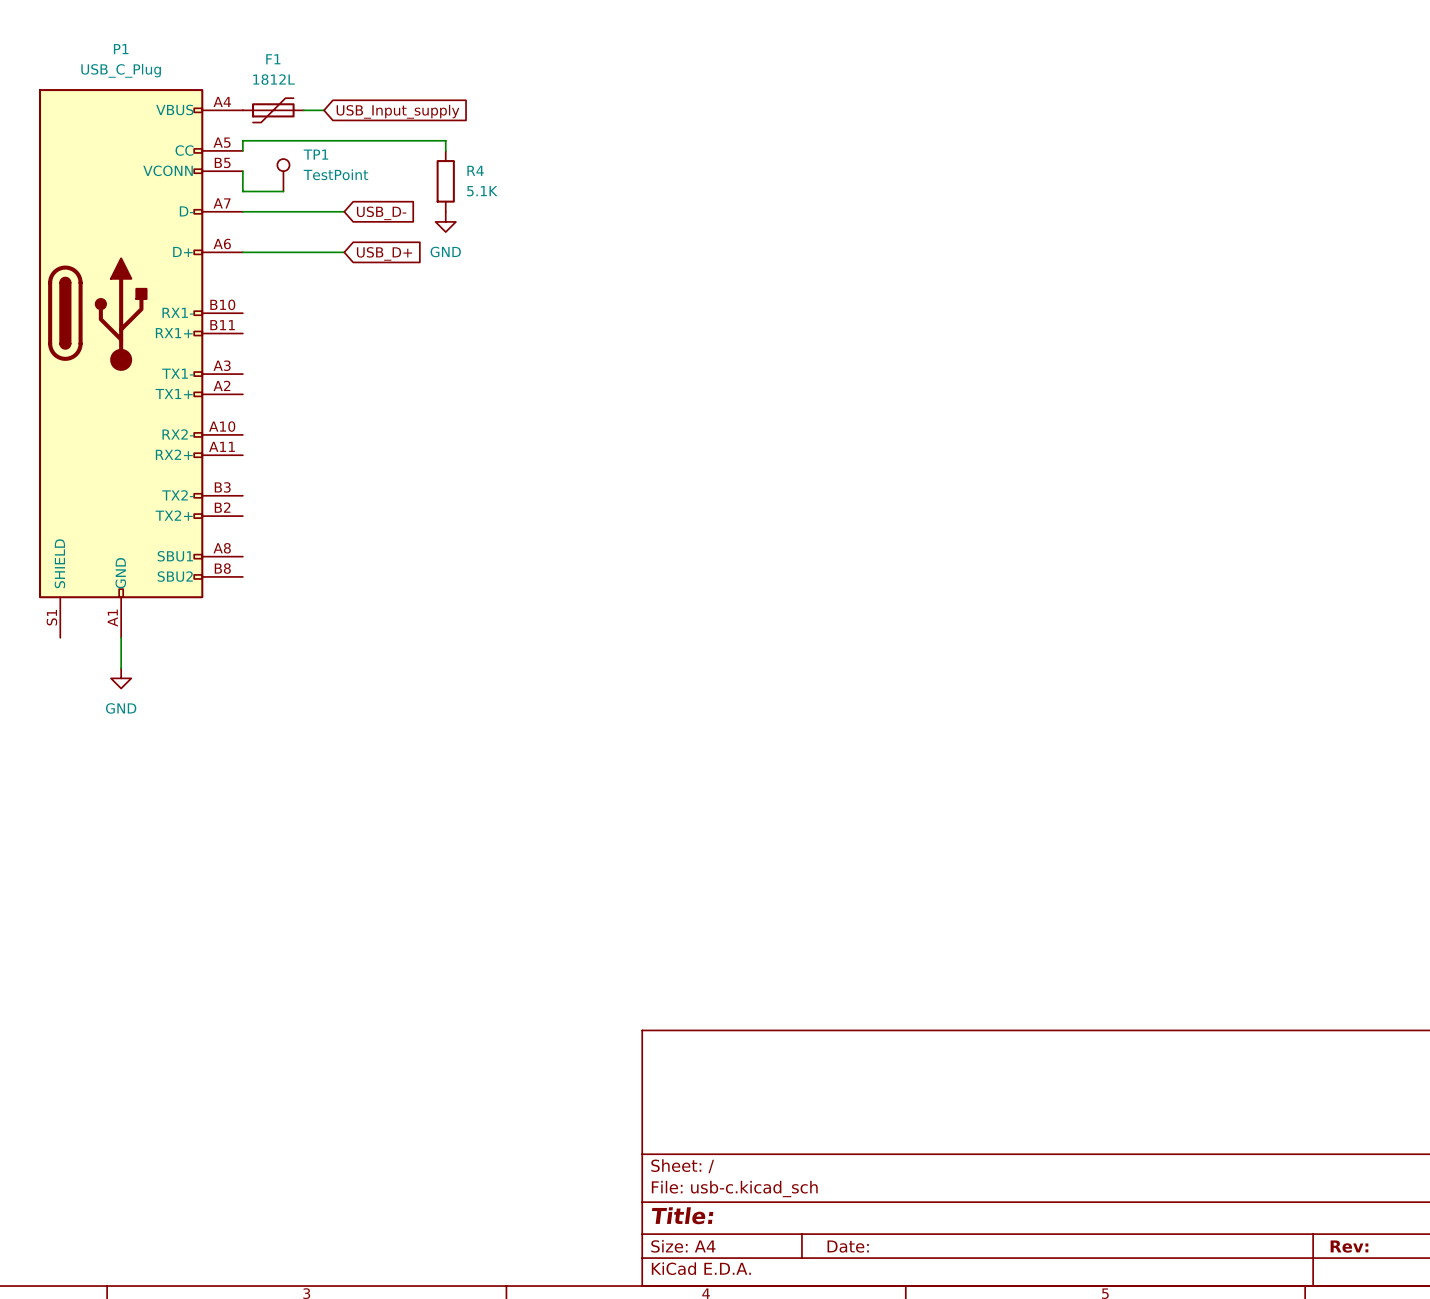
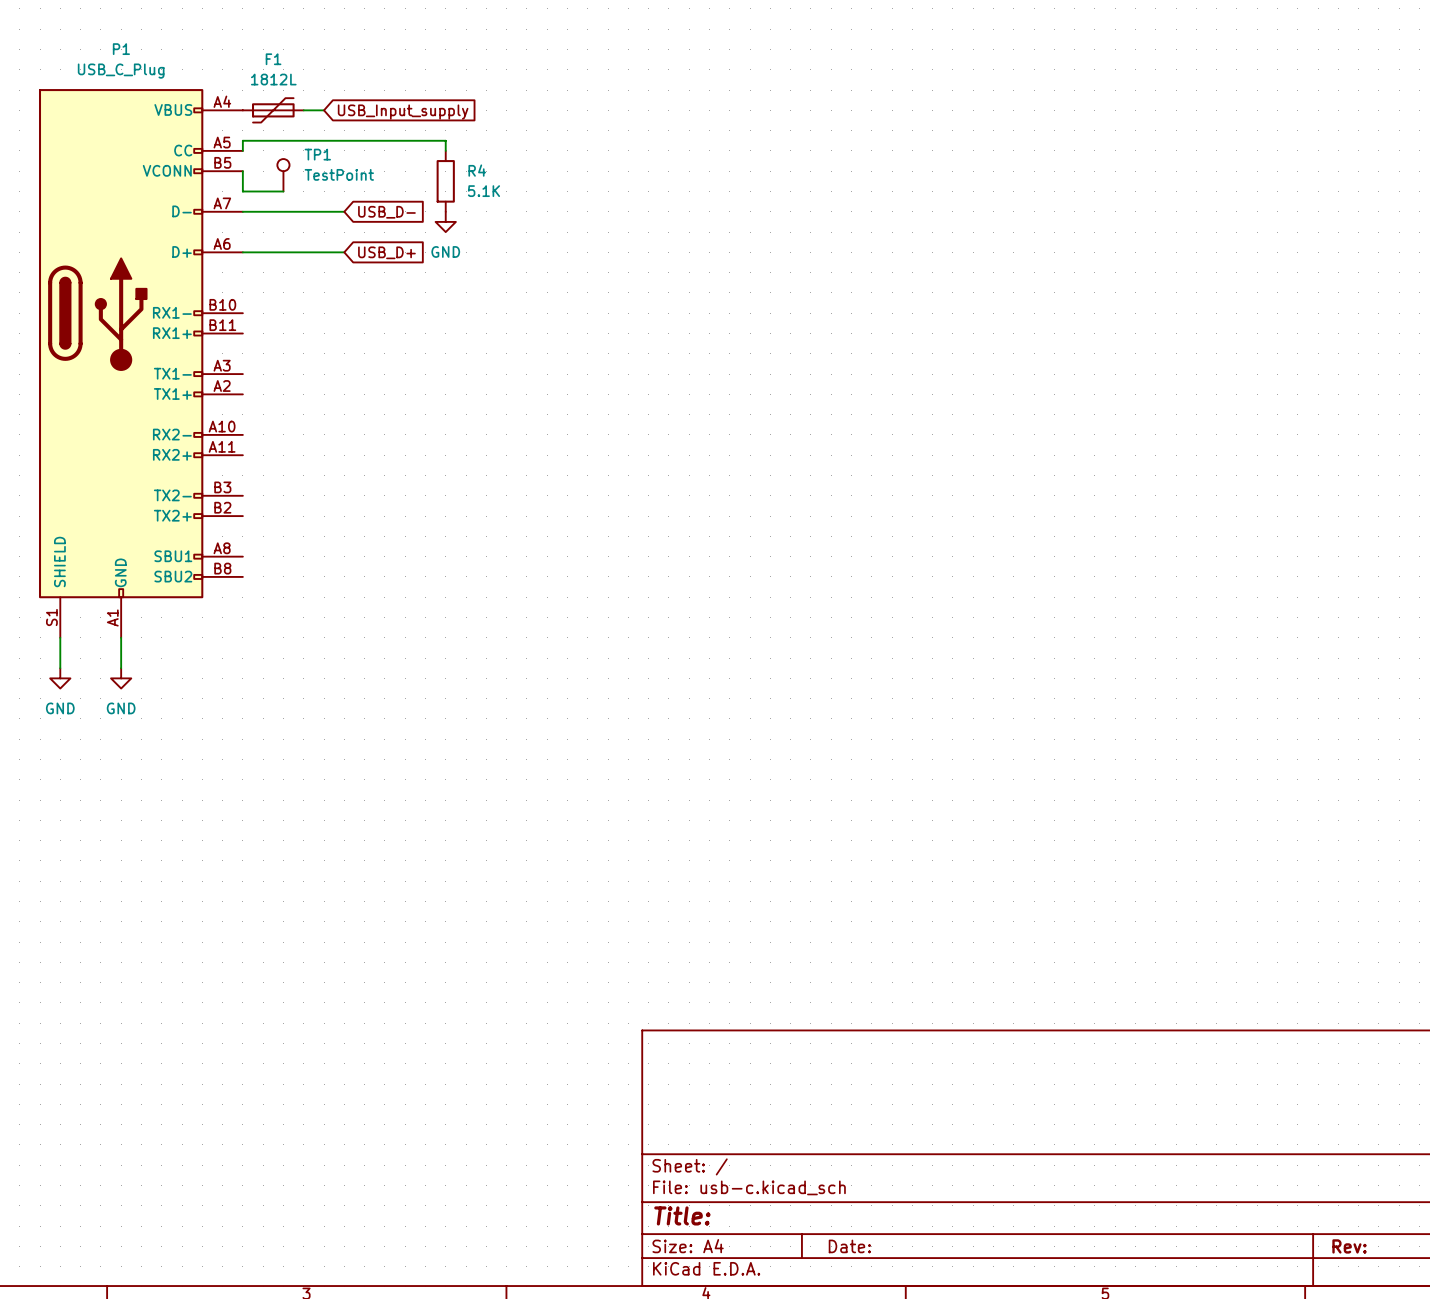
wire: none -> (60, 637) (60, 668)
power symbol: none -> GND (60, 678)

